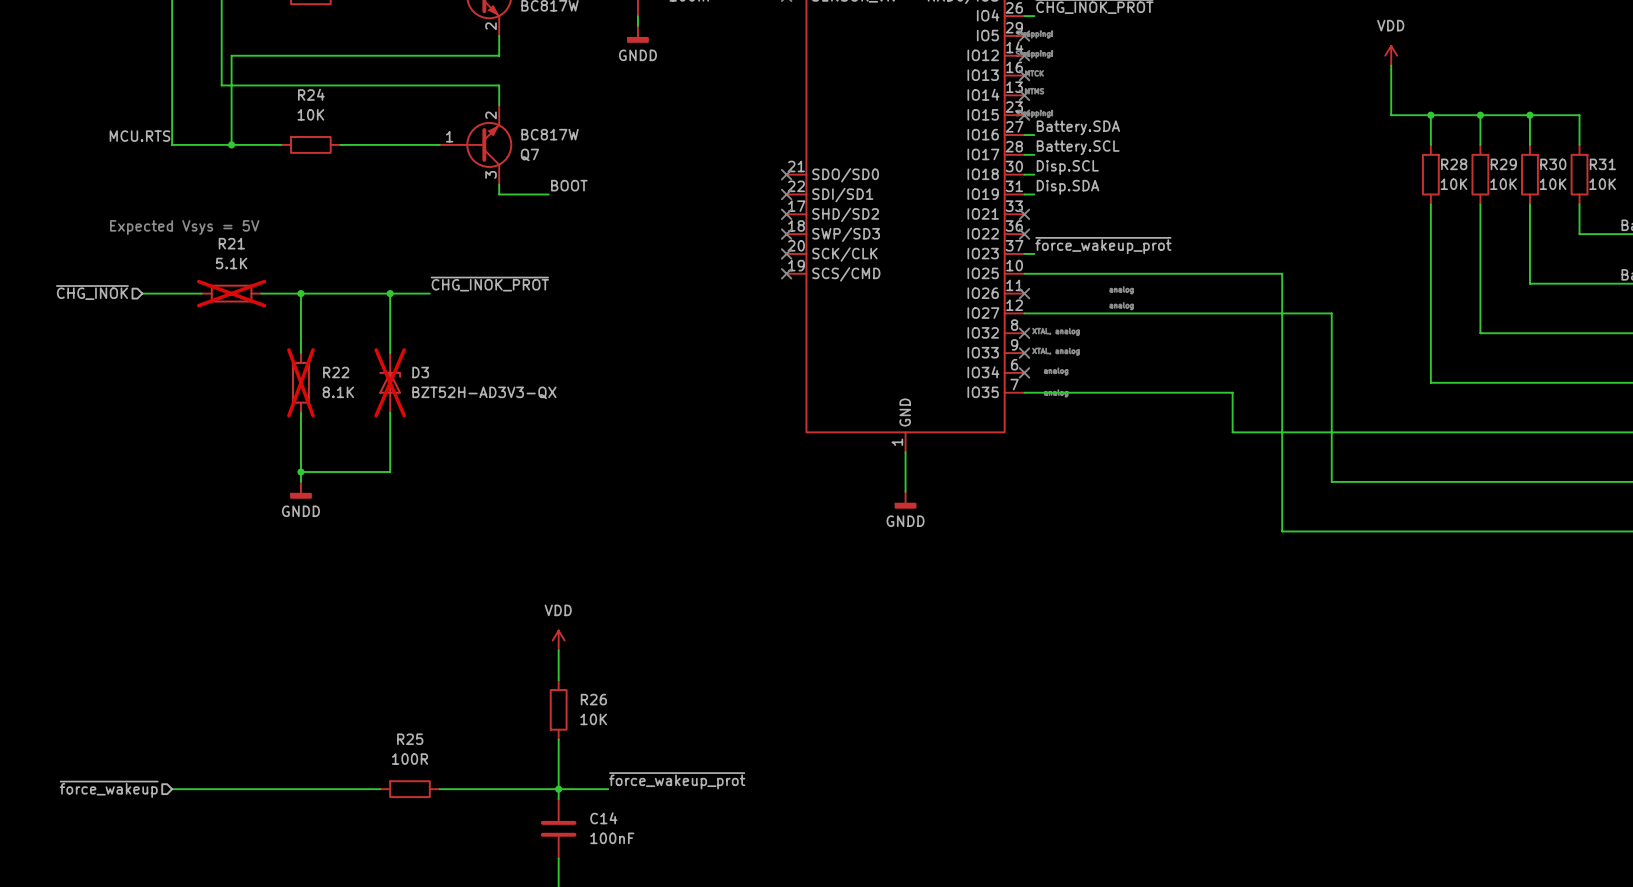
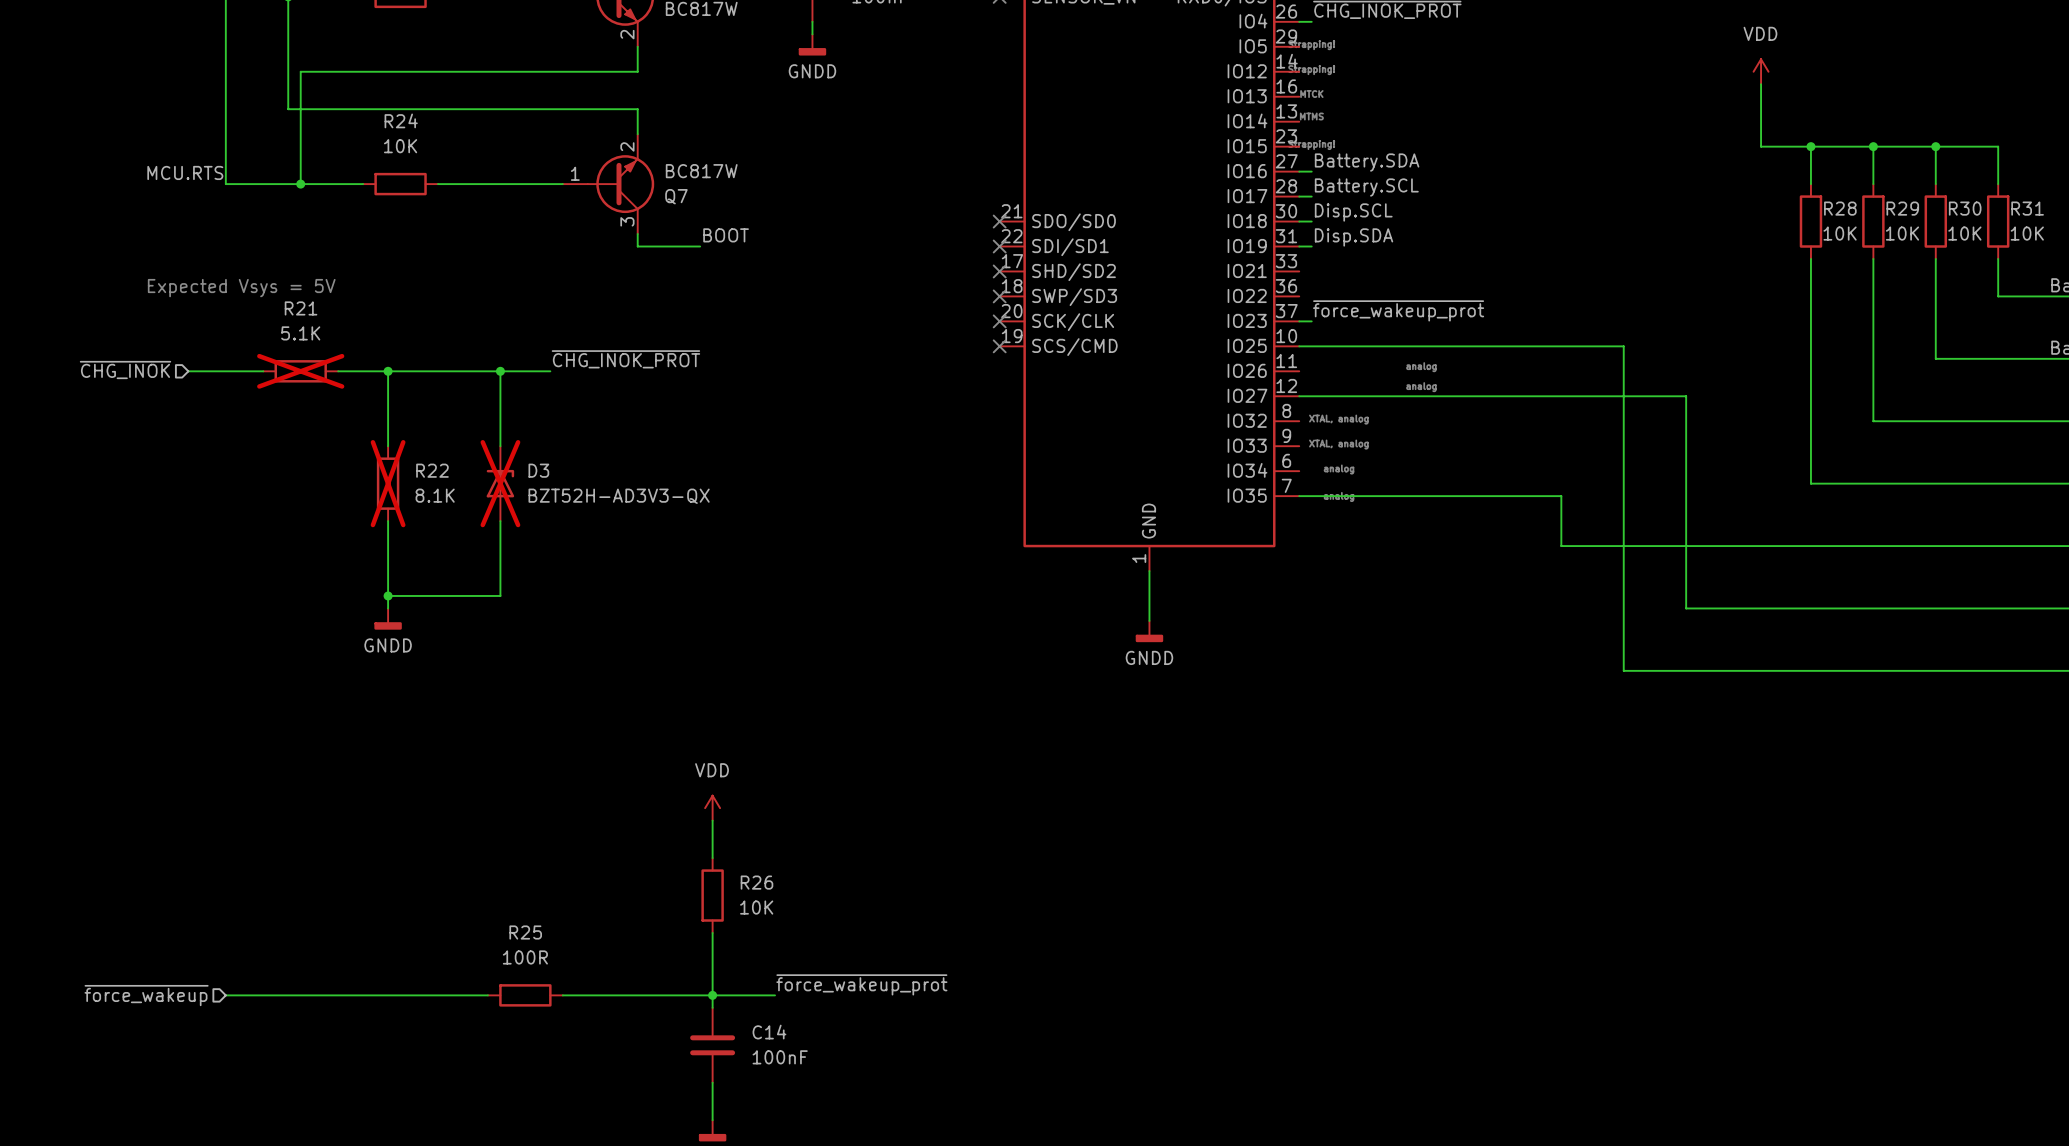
no-connect mark: (1024, 35) -> none
no-connect mark: (1024, 55) -> none
no-connect mark: (1024, 75) -> none
no-connect mark: (1024, 95) -> none
no-connect mark: (1024, 115) -> none
no-connect mark: (1024, 214) -> none
no-connect mark: (1024, 234) -> none
no-connect mark: (1024, 293) -> none
no-connect mark: (1024, 333) -> none
no-connect mark: (1024, 353) -> none
no-connect mark: (1024, 372) -> none

